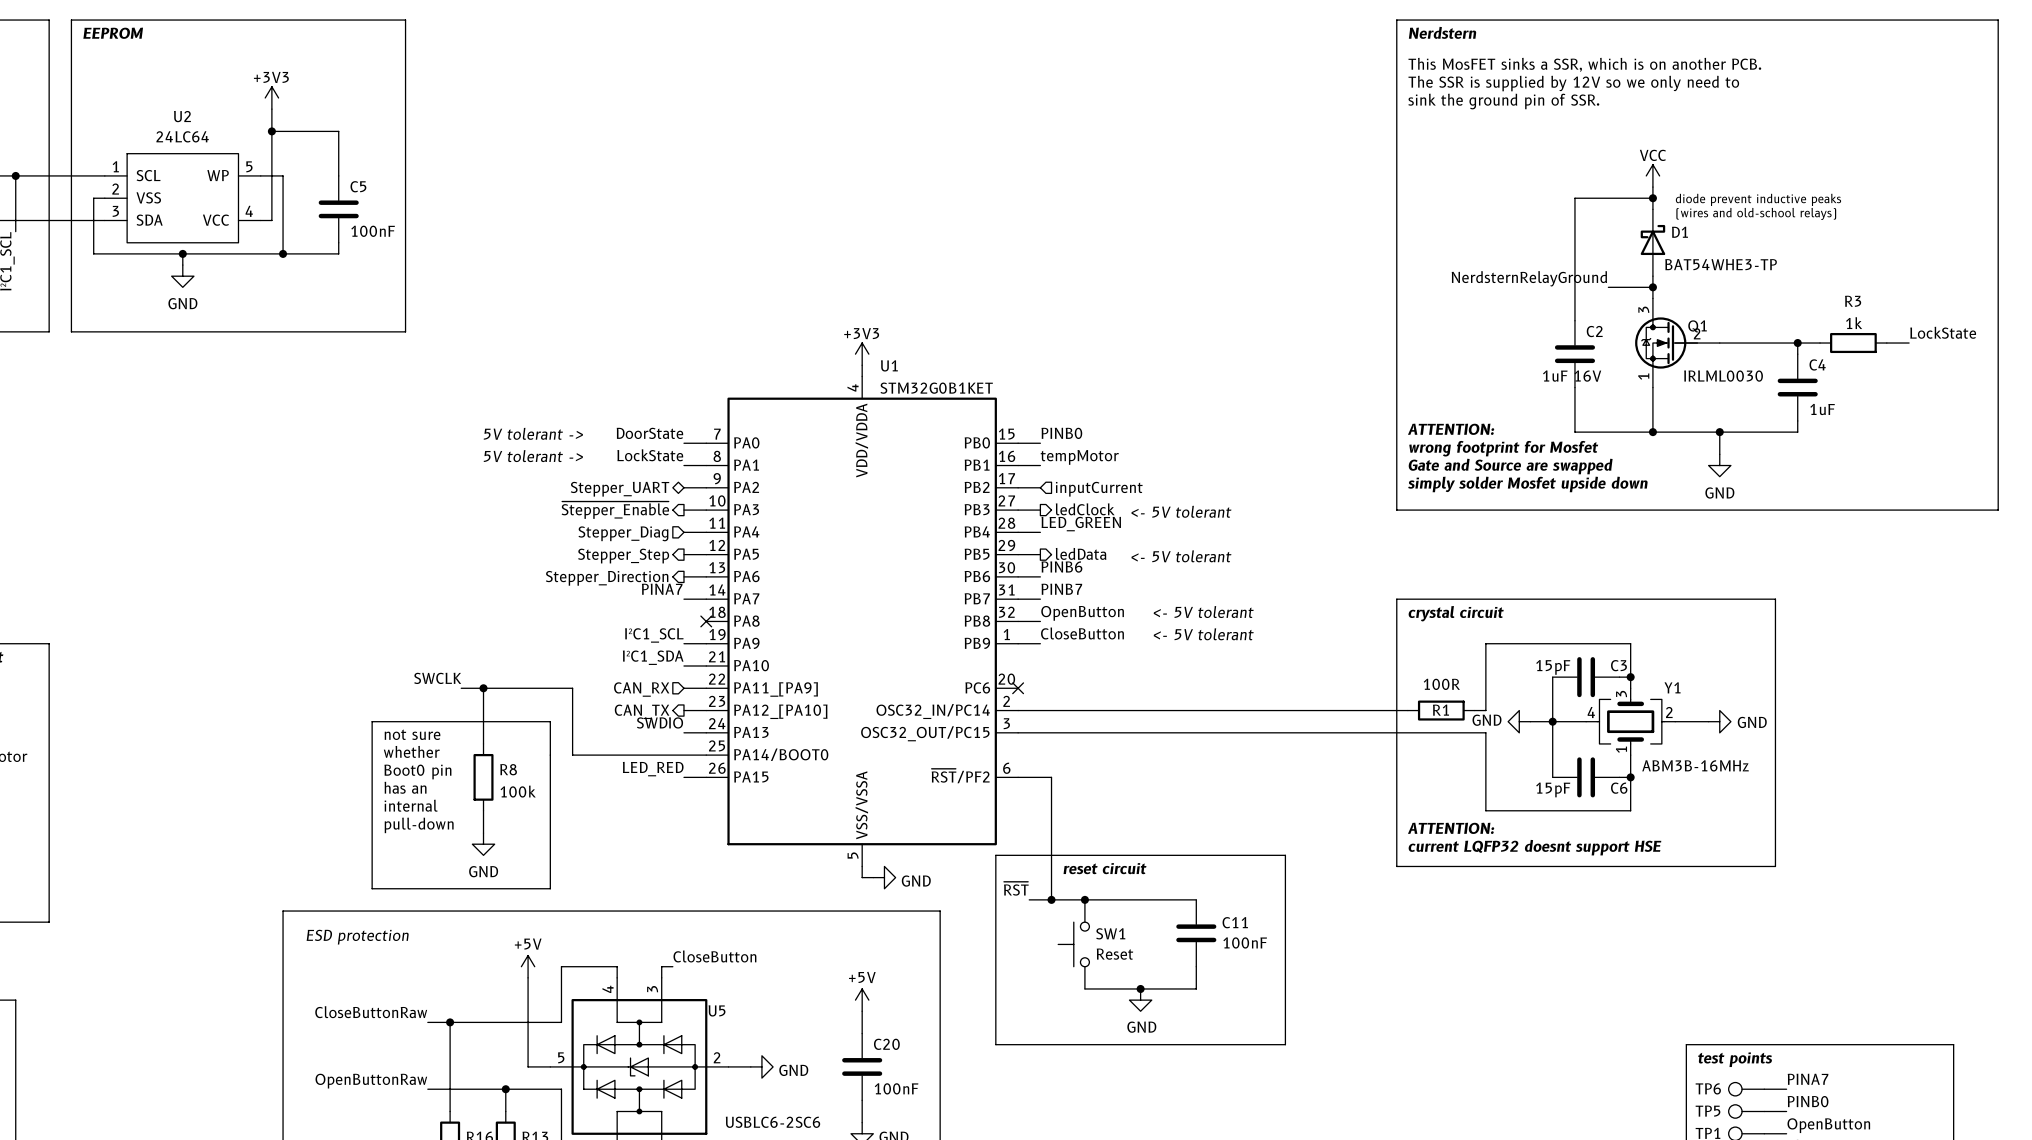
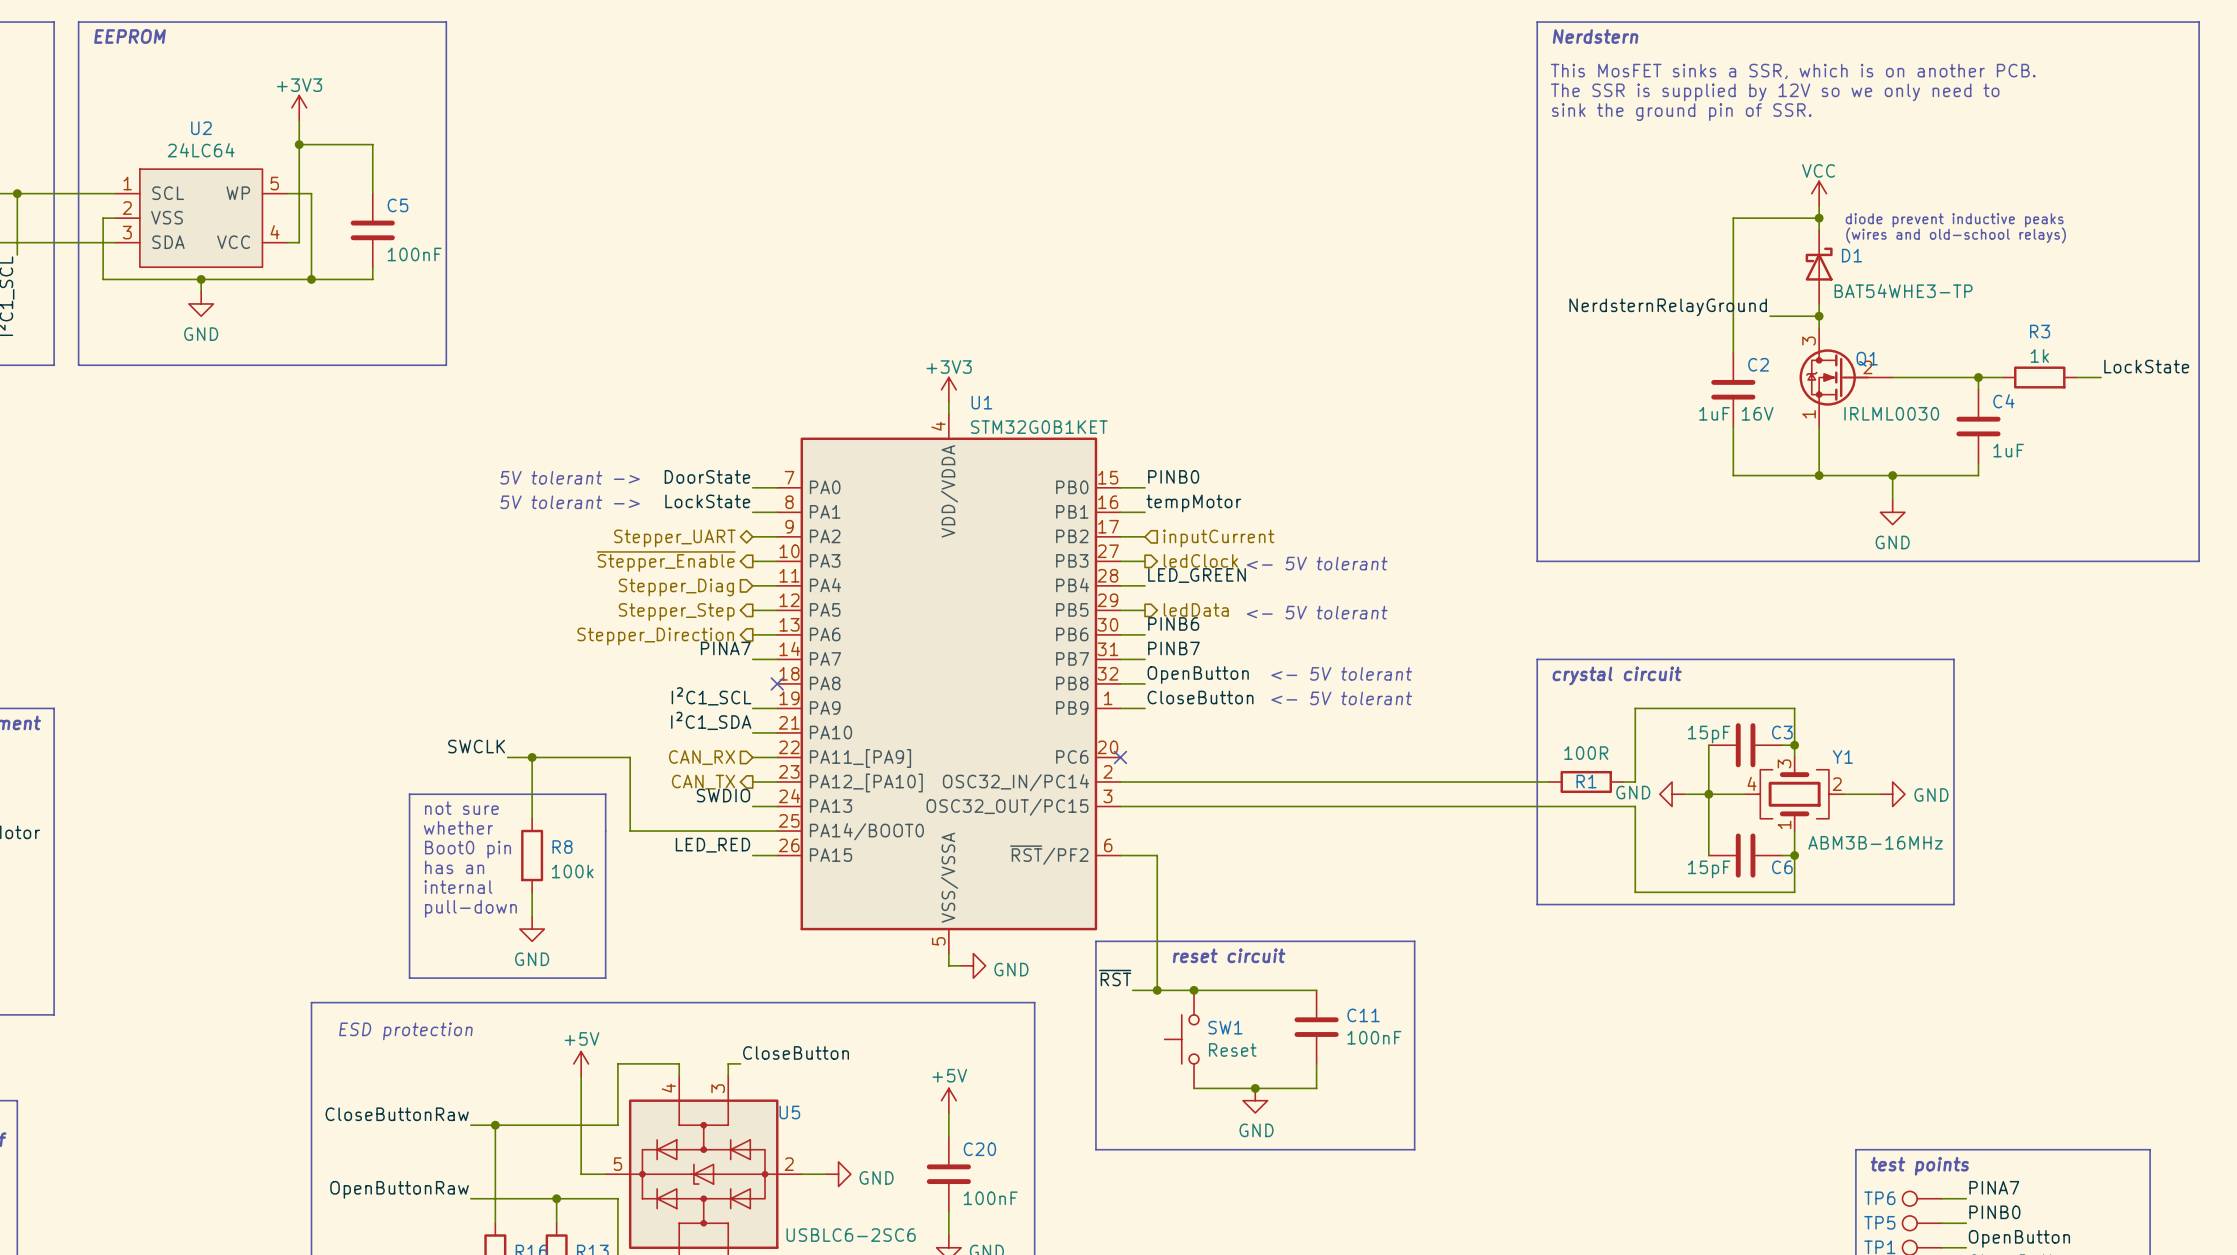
text: ATTENTION: (1451, 429) -> none
text: wrong footprint for Mosfet (1503, 448) -> none
text: Gate and Source are swapped (1510, 466) -> none
text: simply solder Mosfet upside down (1527, 484) -> none
line: (1396, 821) (1396, 866) (1775, 866) (1775, 821) -> (1537, 904) (1953, 904)
text: ATTENTION: (1451, 828) -> none
text: current LQFP32 doesnt support HSE (1534, 847) -> none

